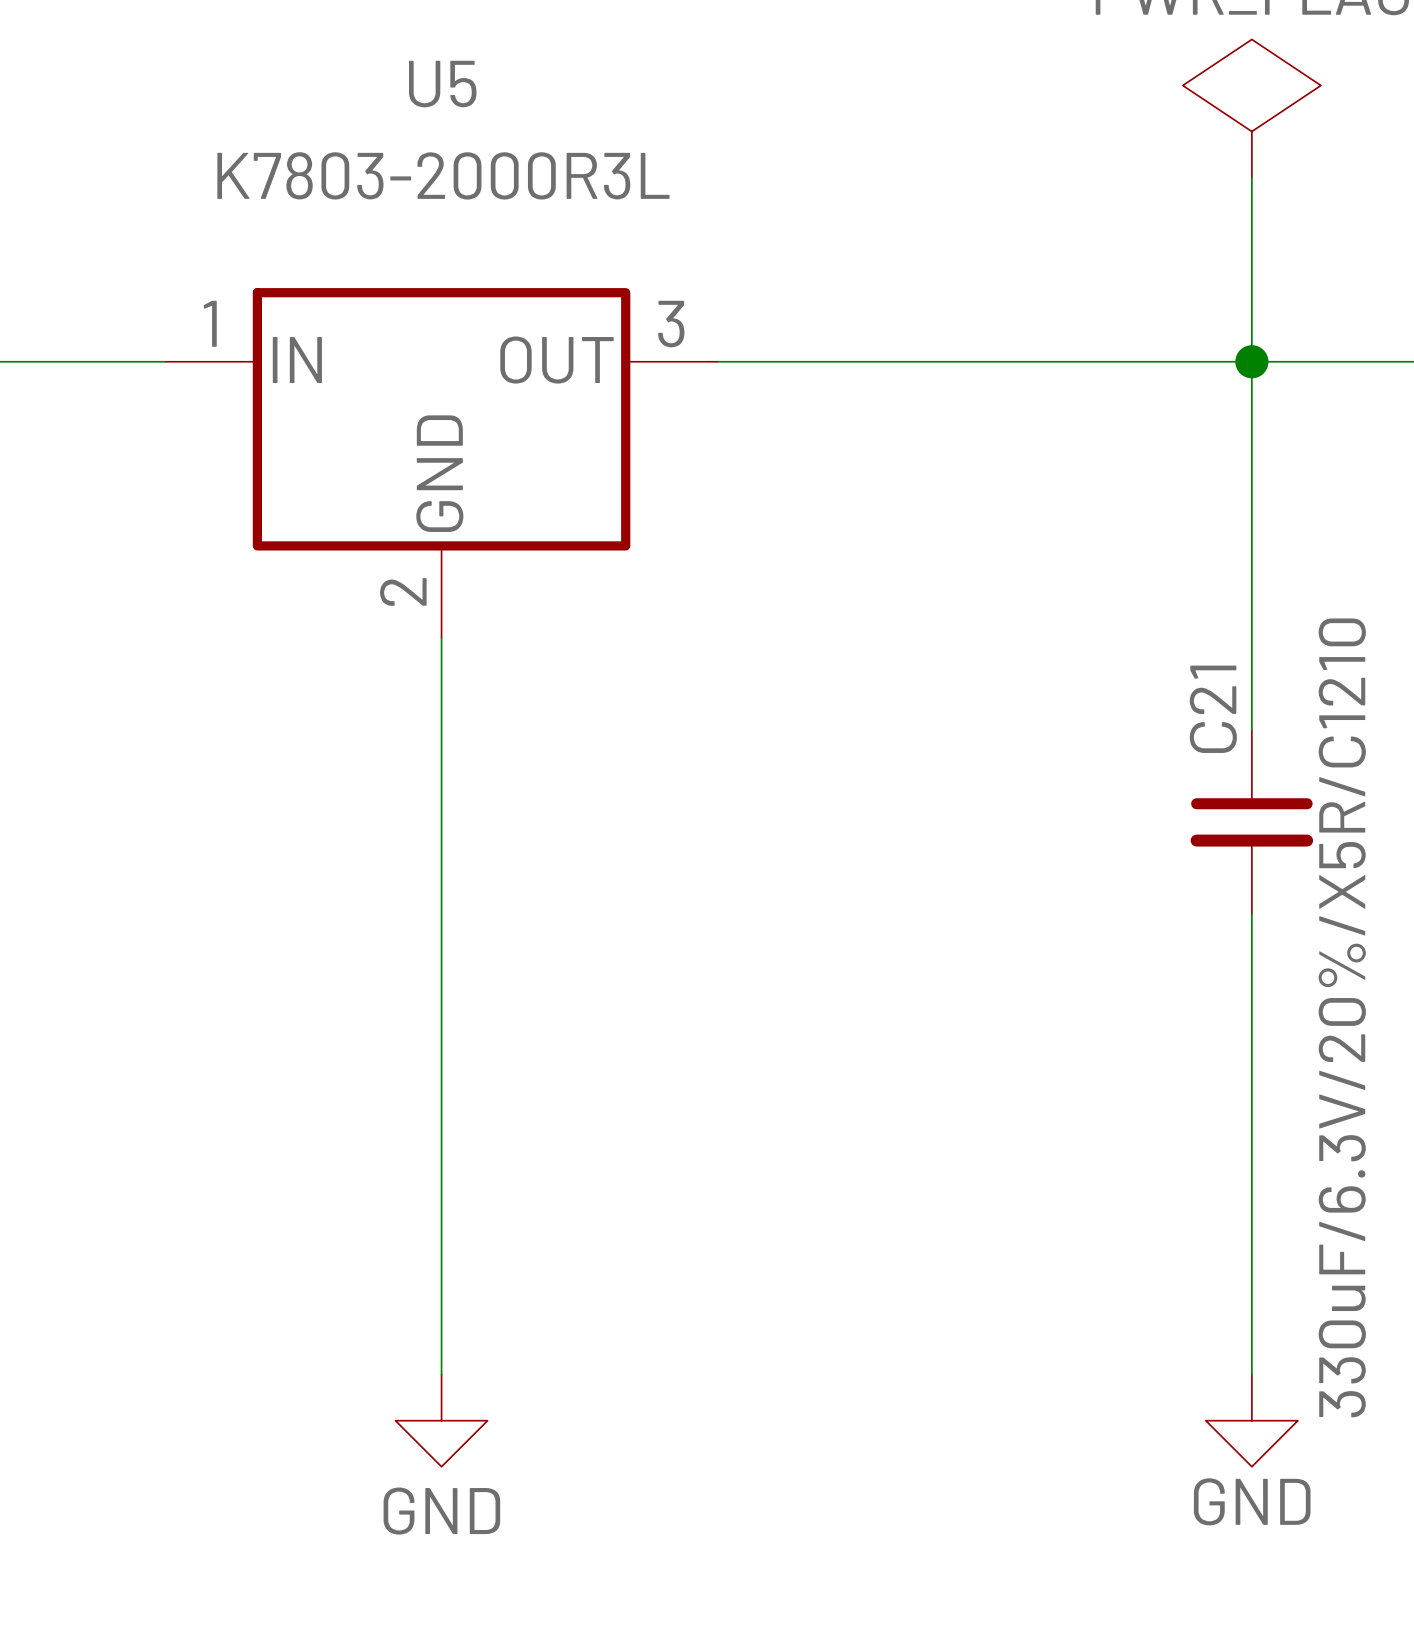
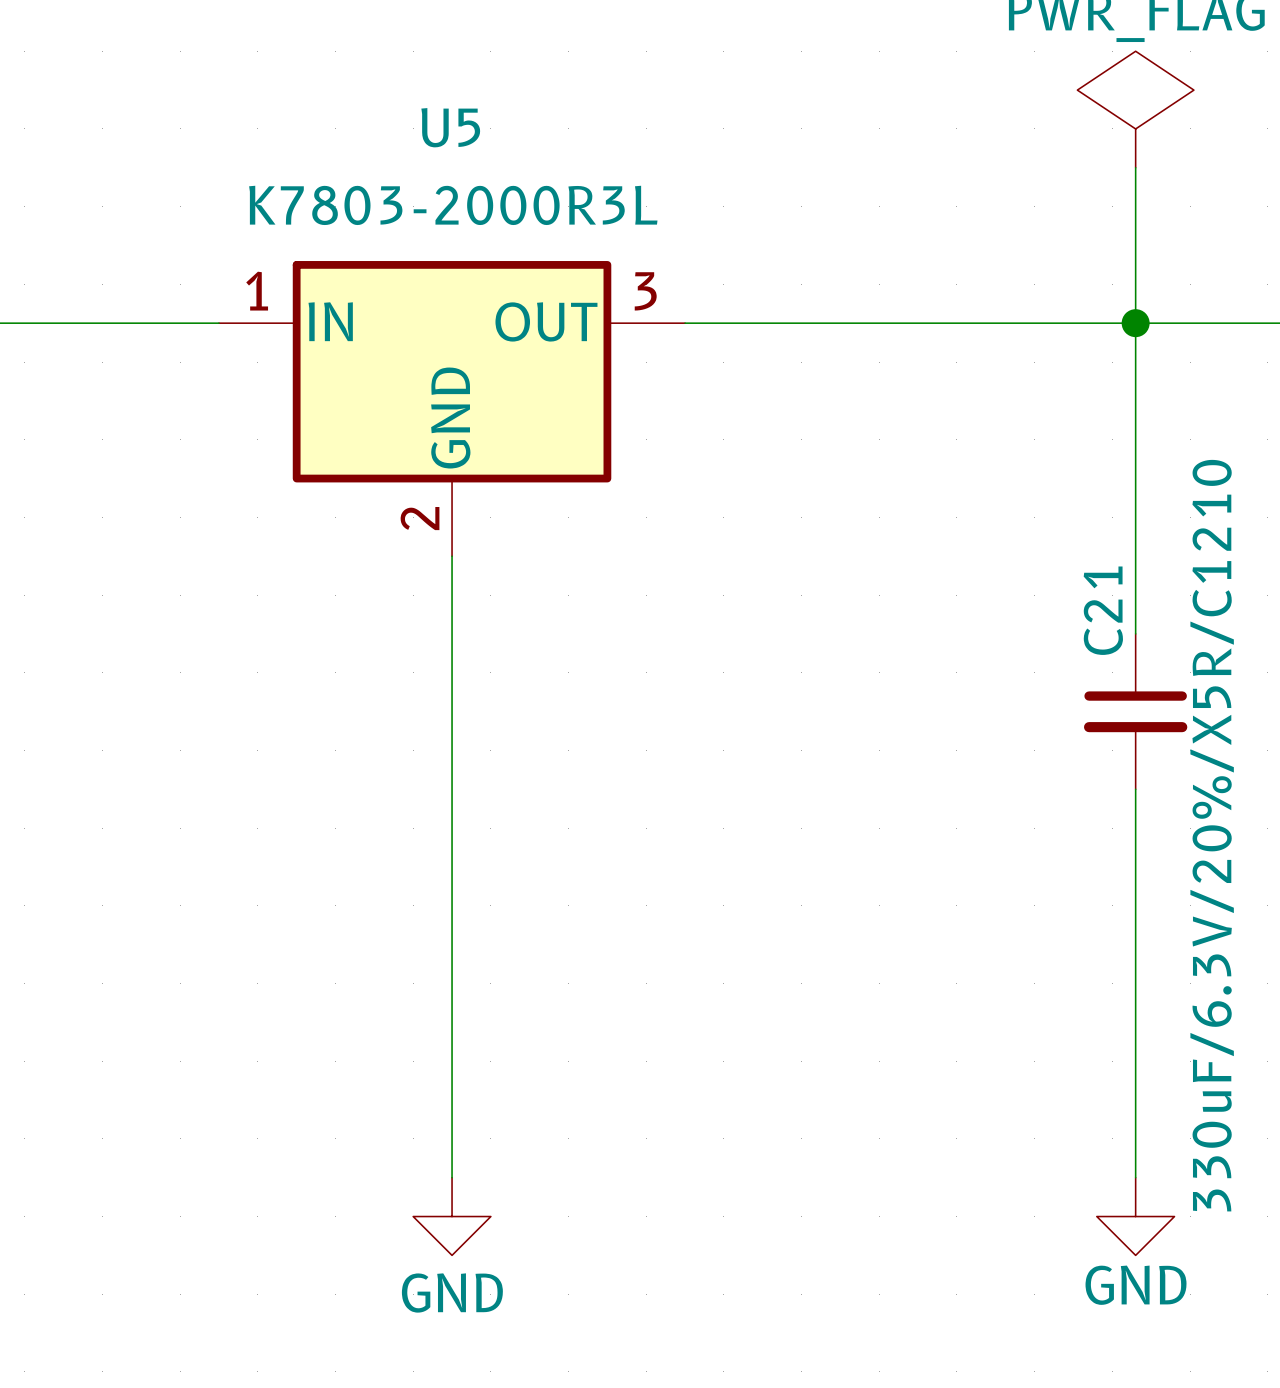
U5 name position: U5 (442, 84) -> U5 (450, 127)
U5 value position: K7803-2000R3L (443, 175) -> K7803-2000R3L (453, 205)

